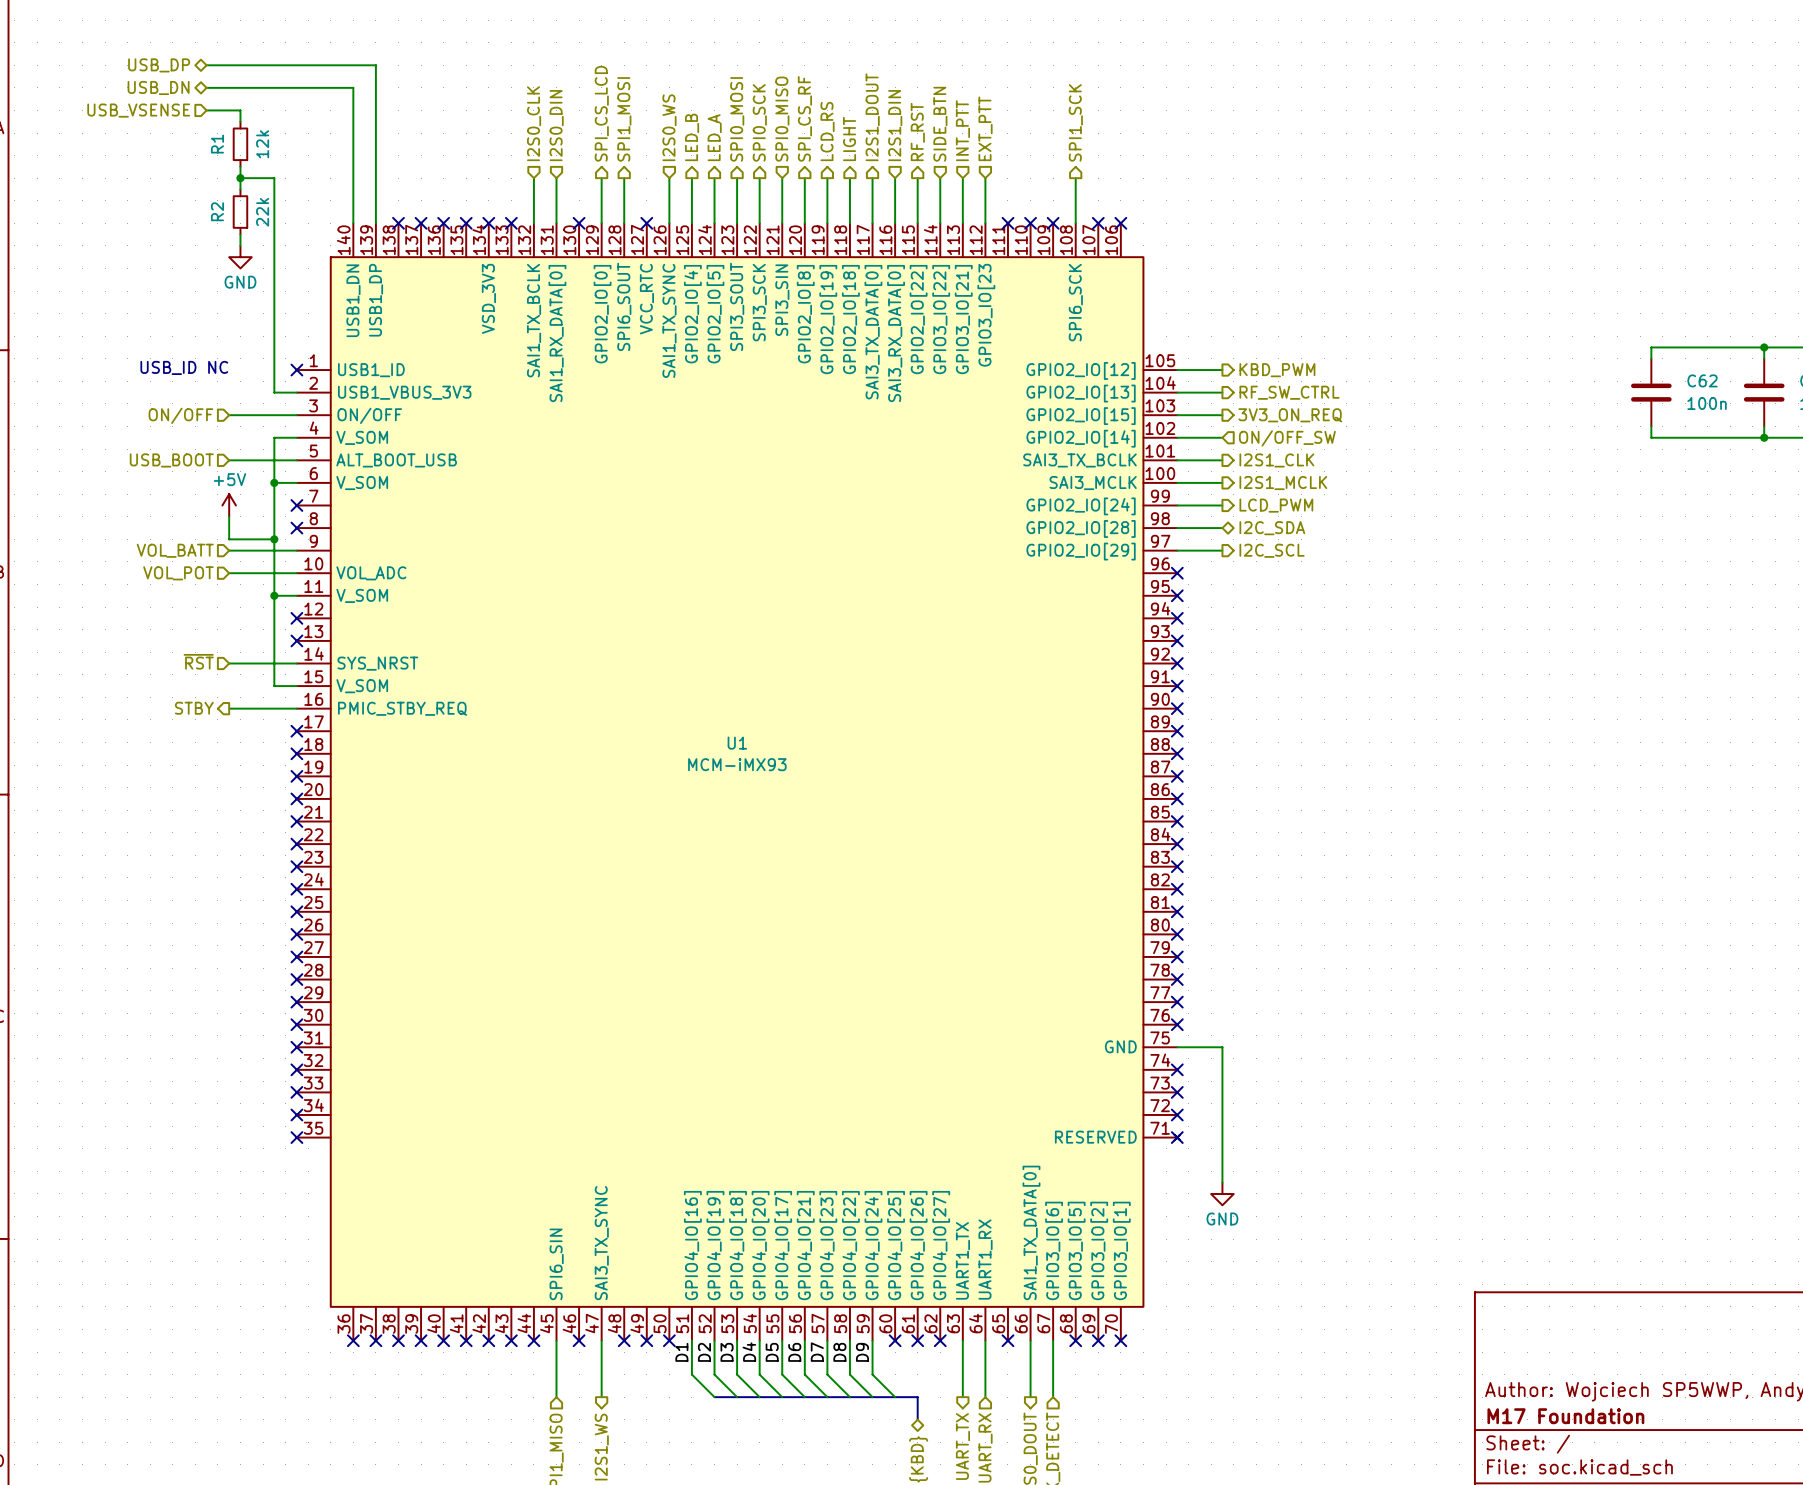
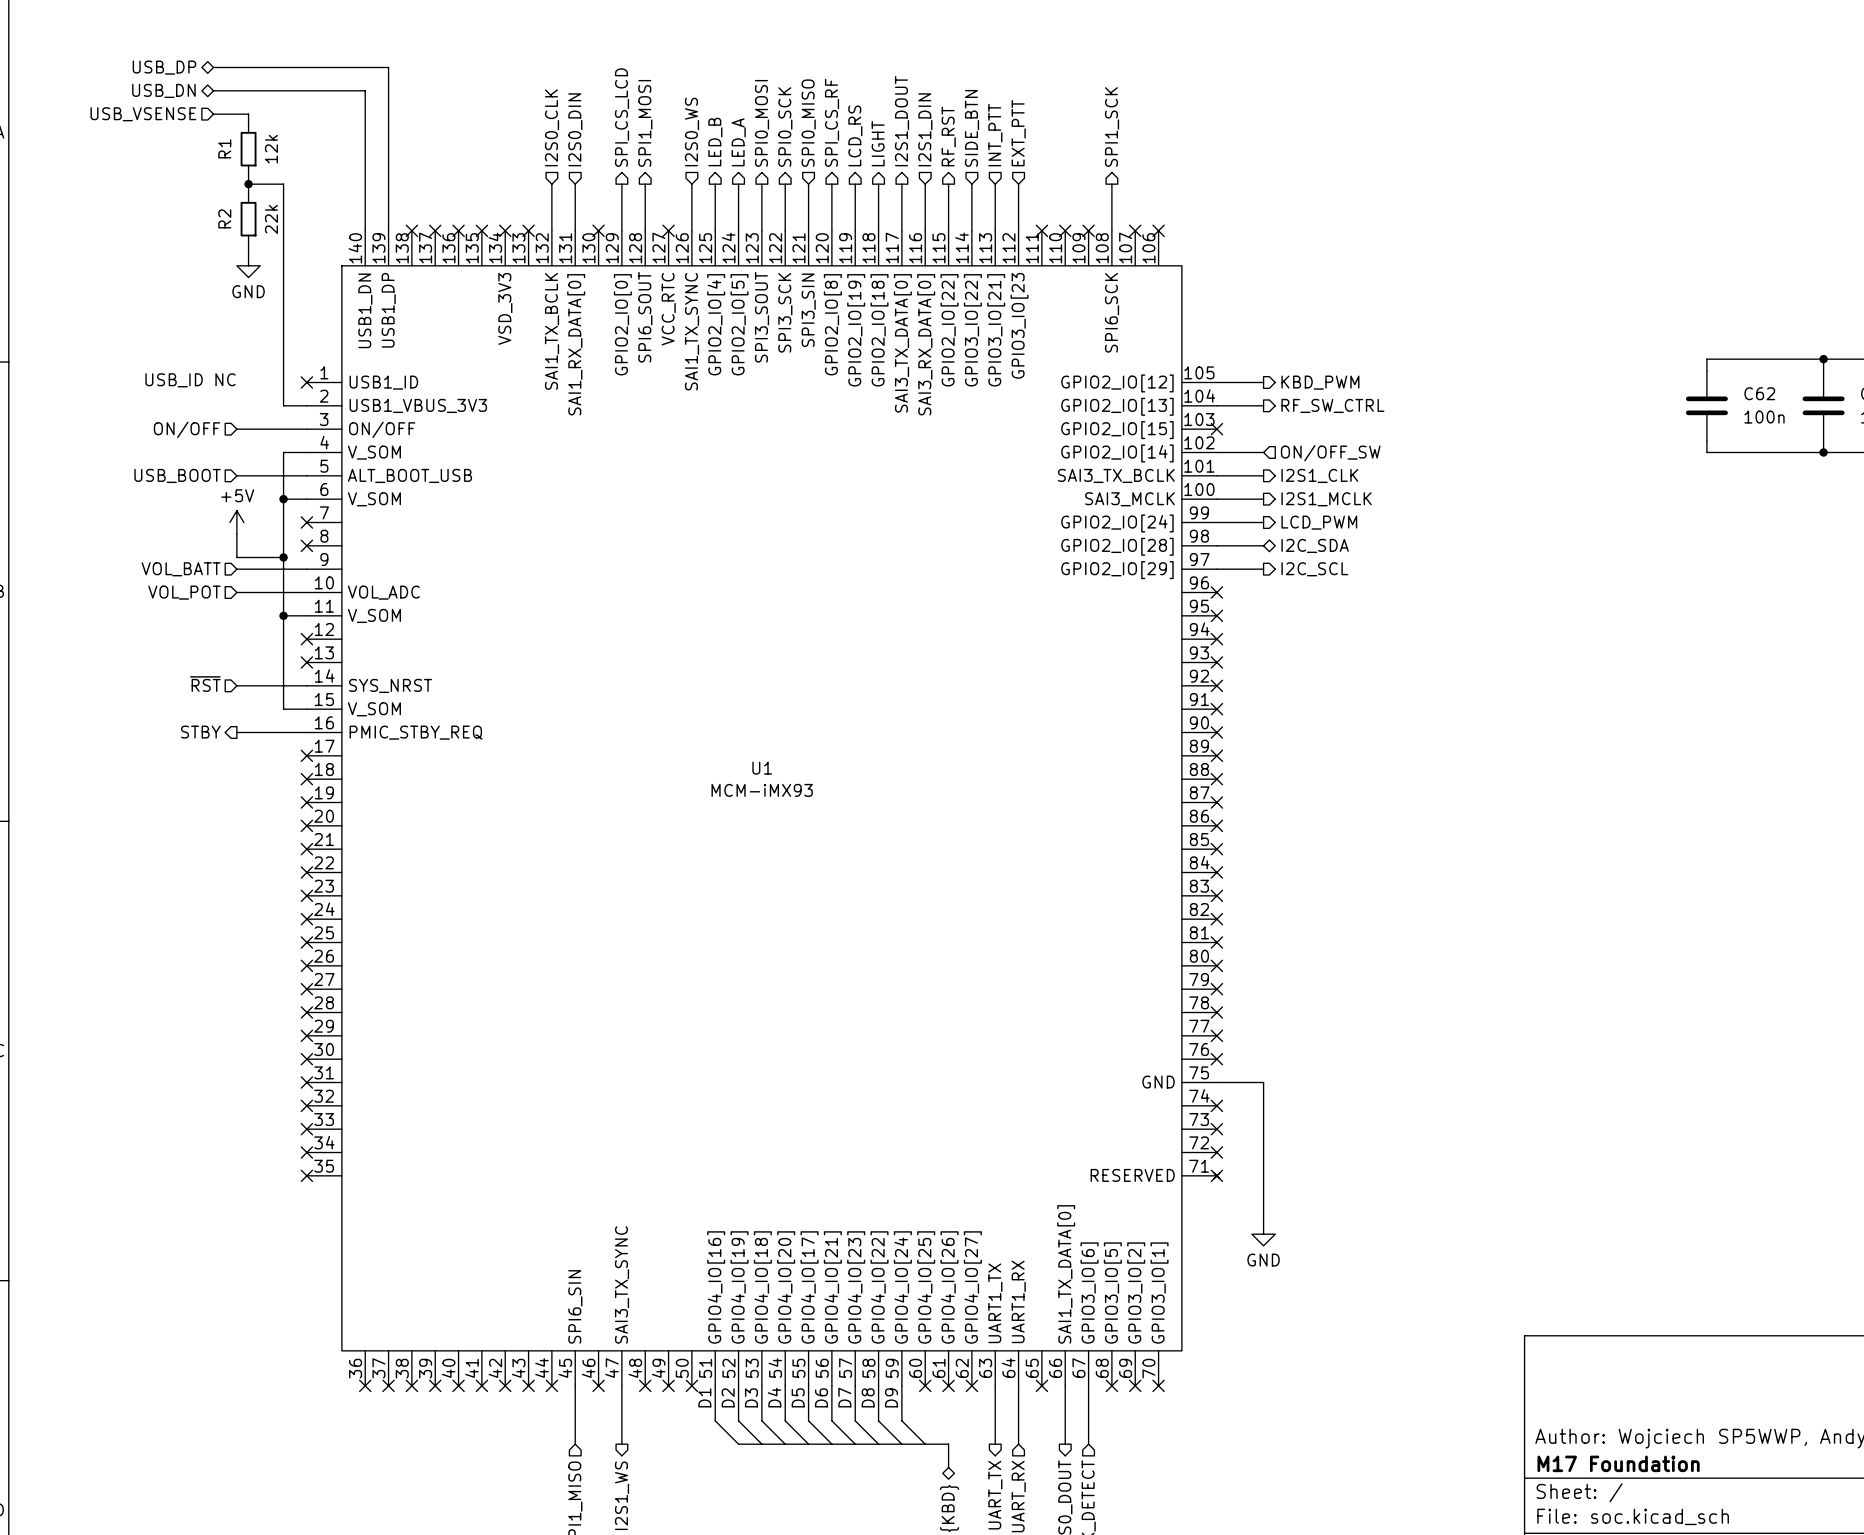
wire: (1177, 415) (1222, 415) -> none
no-connect mark: none -> (1216, 429)
hierarchical label: 3V3_ON_REQ (1290, 415) -> none

